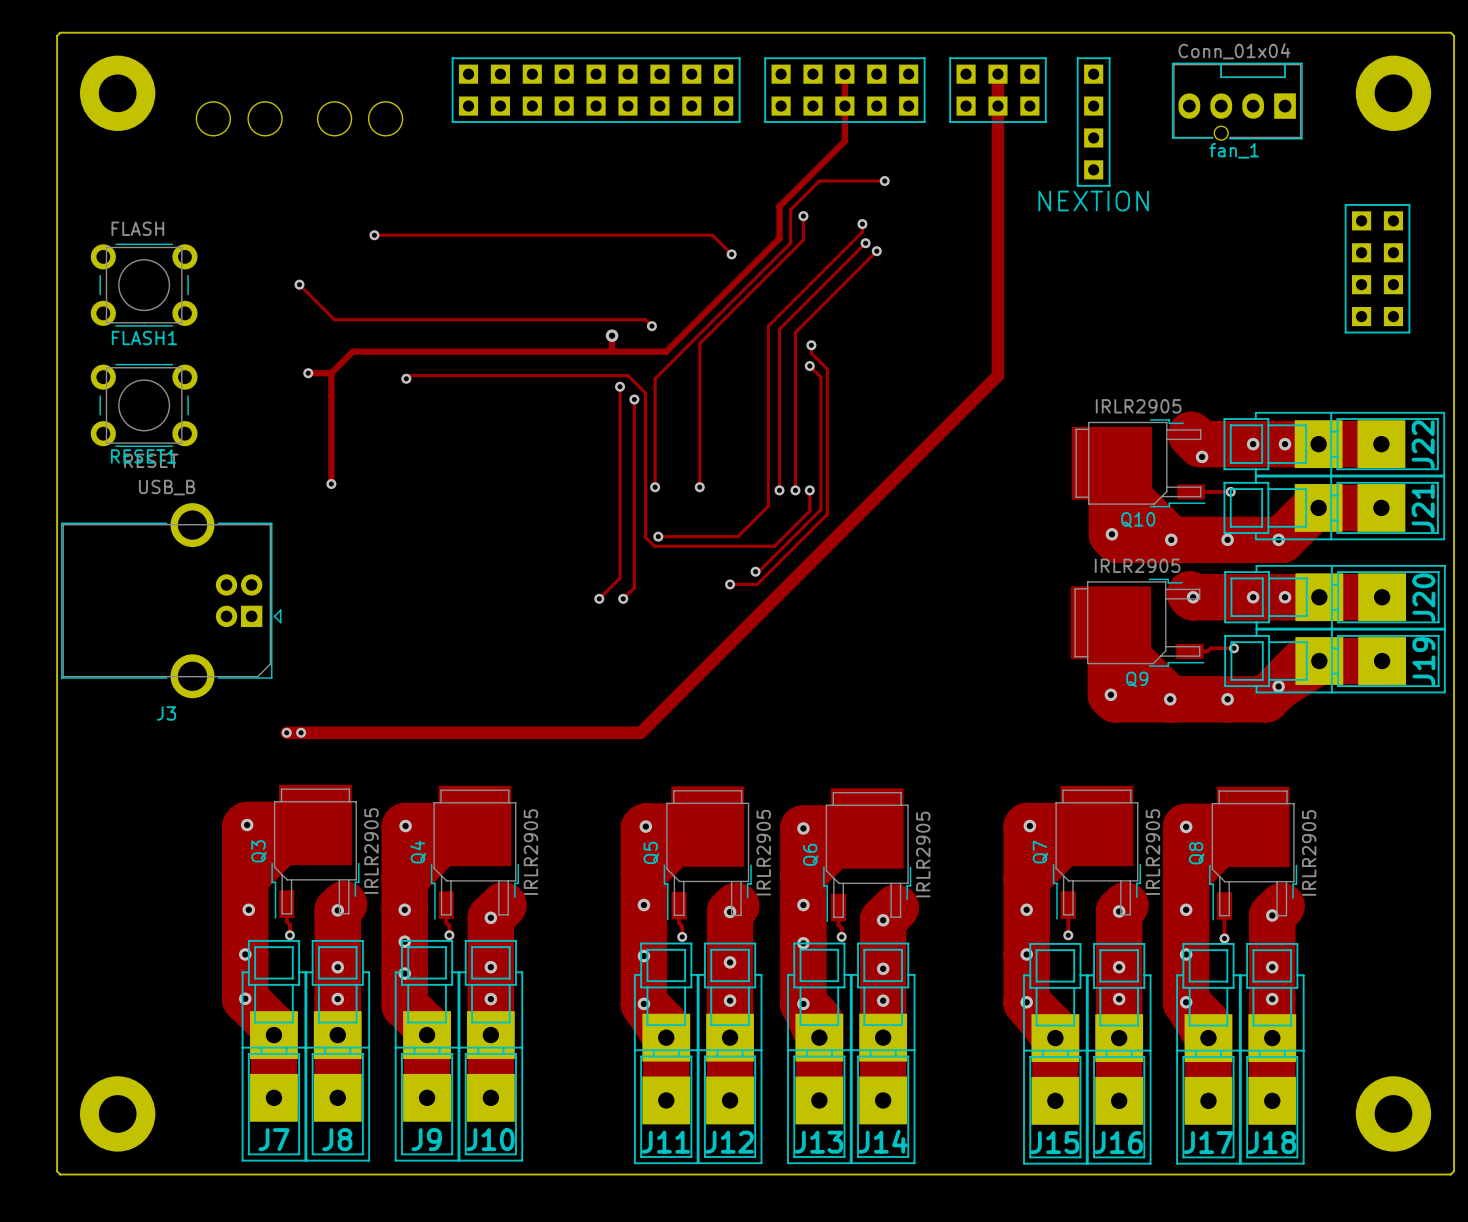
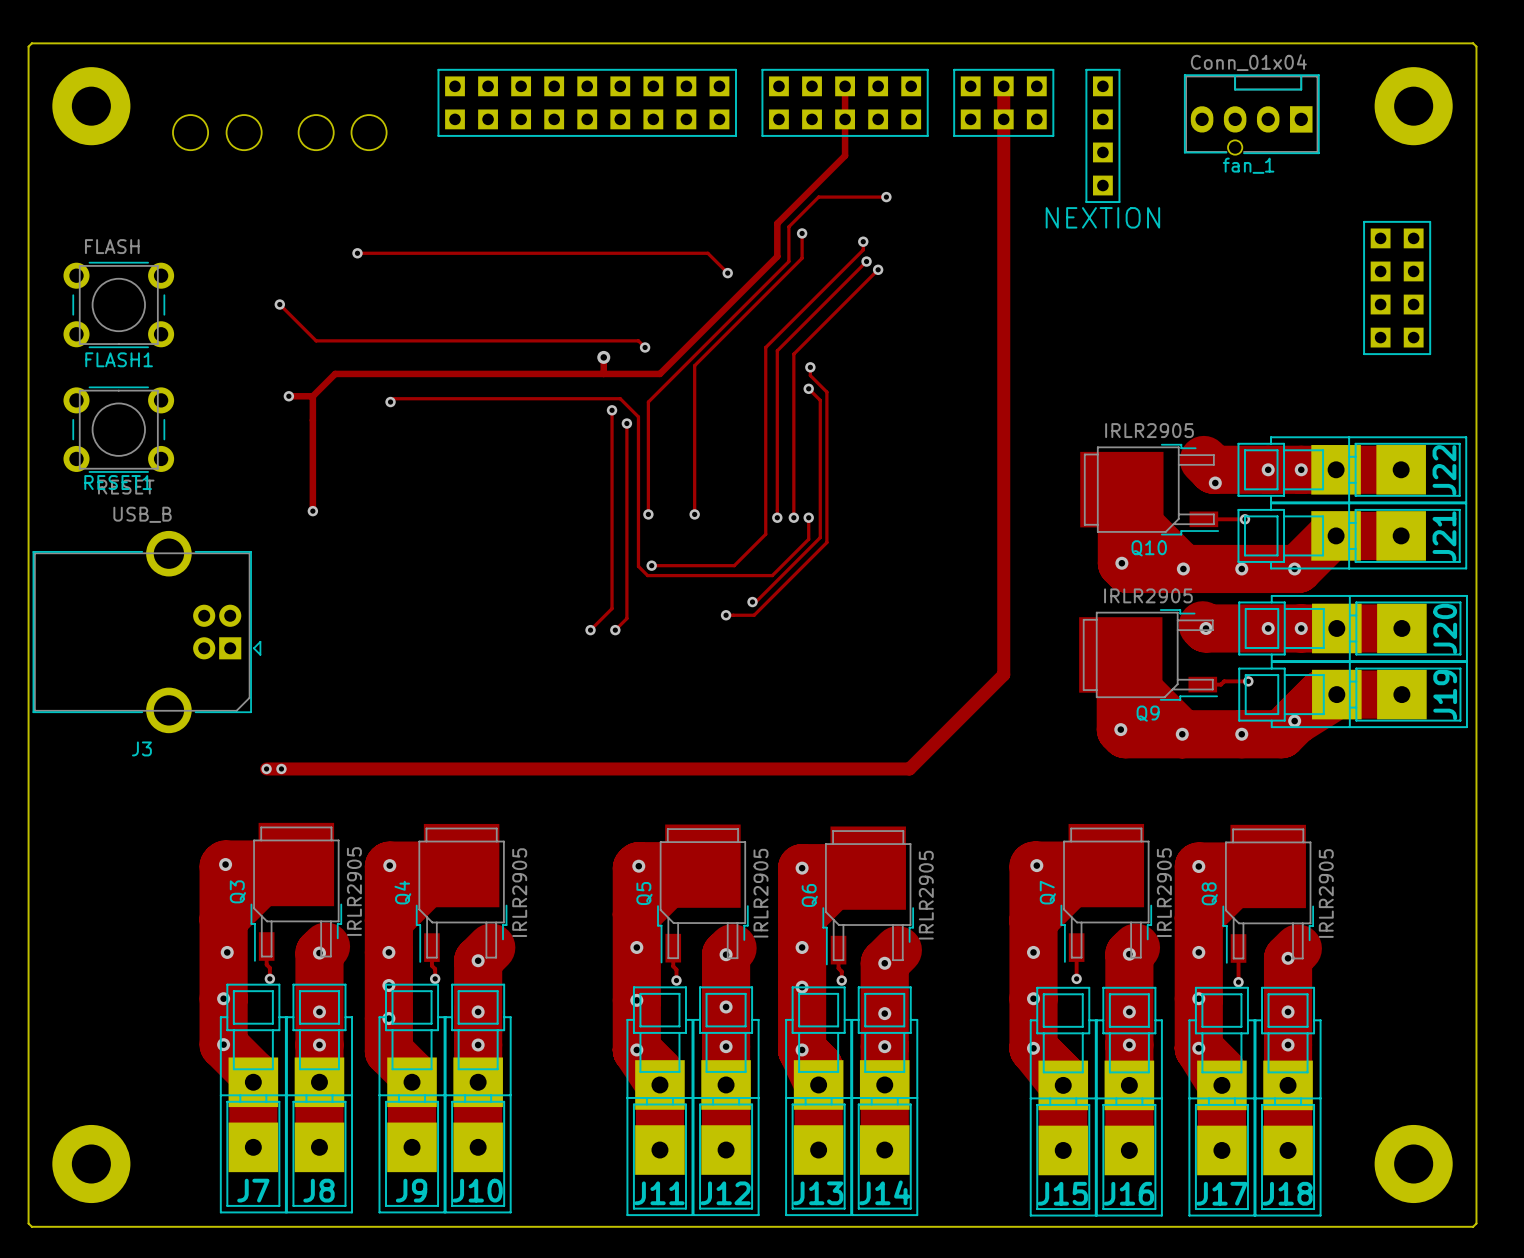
track: (997, 375) (640, 732) -> (1003, 398) (1003, 674) (909, 768) (633, 768)

